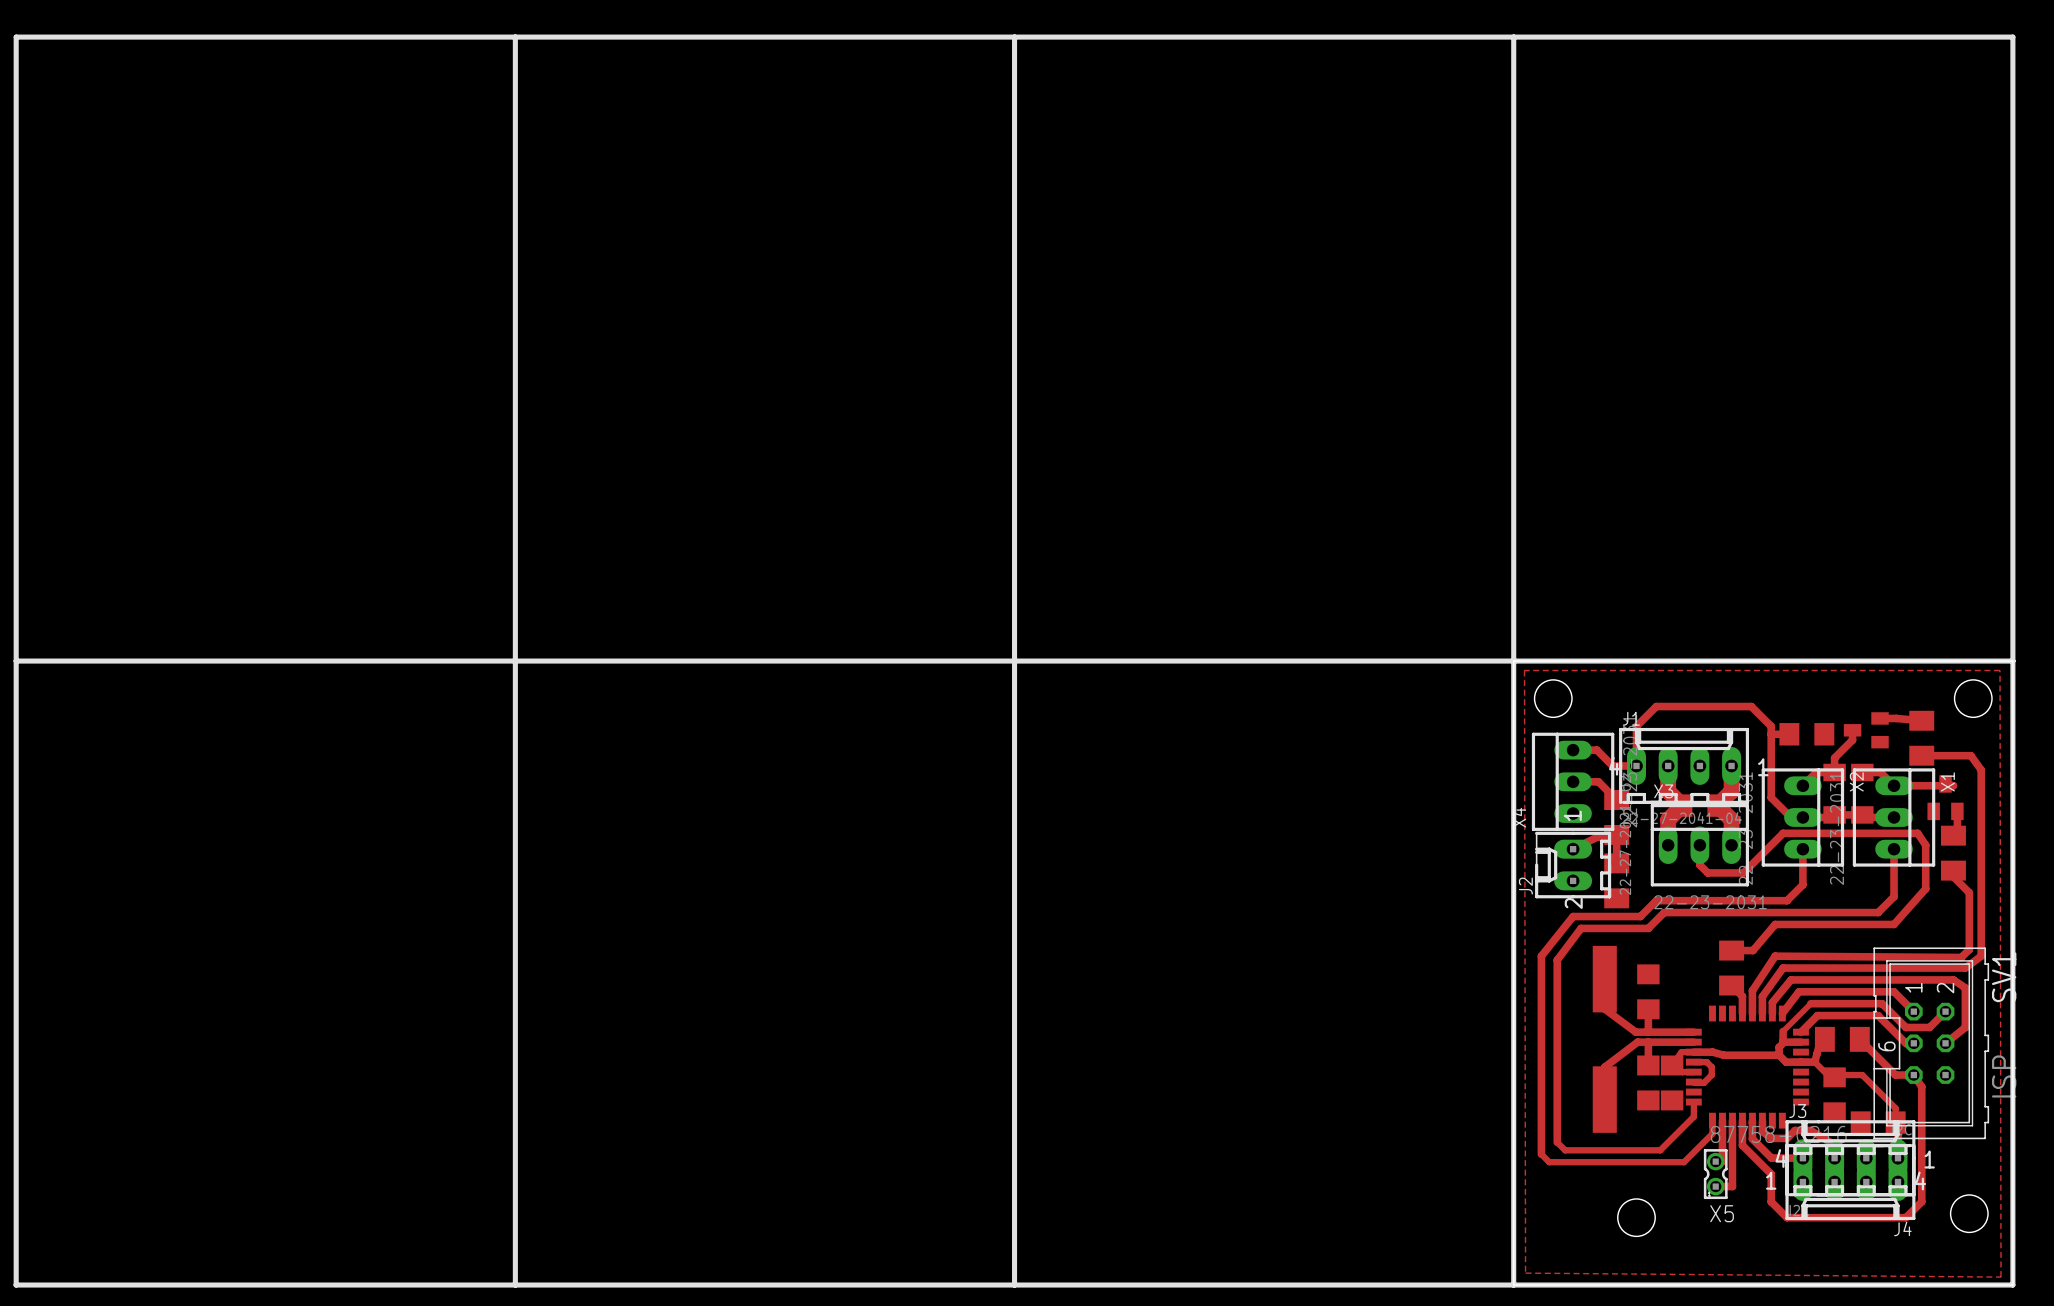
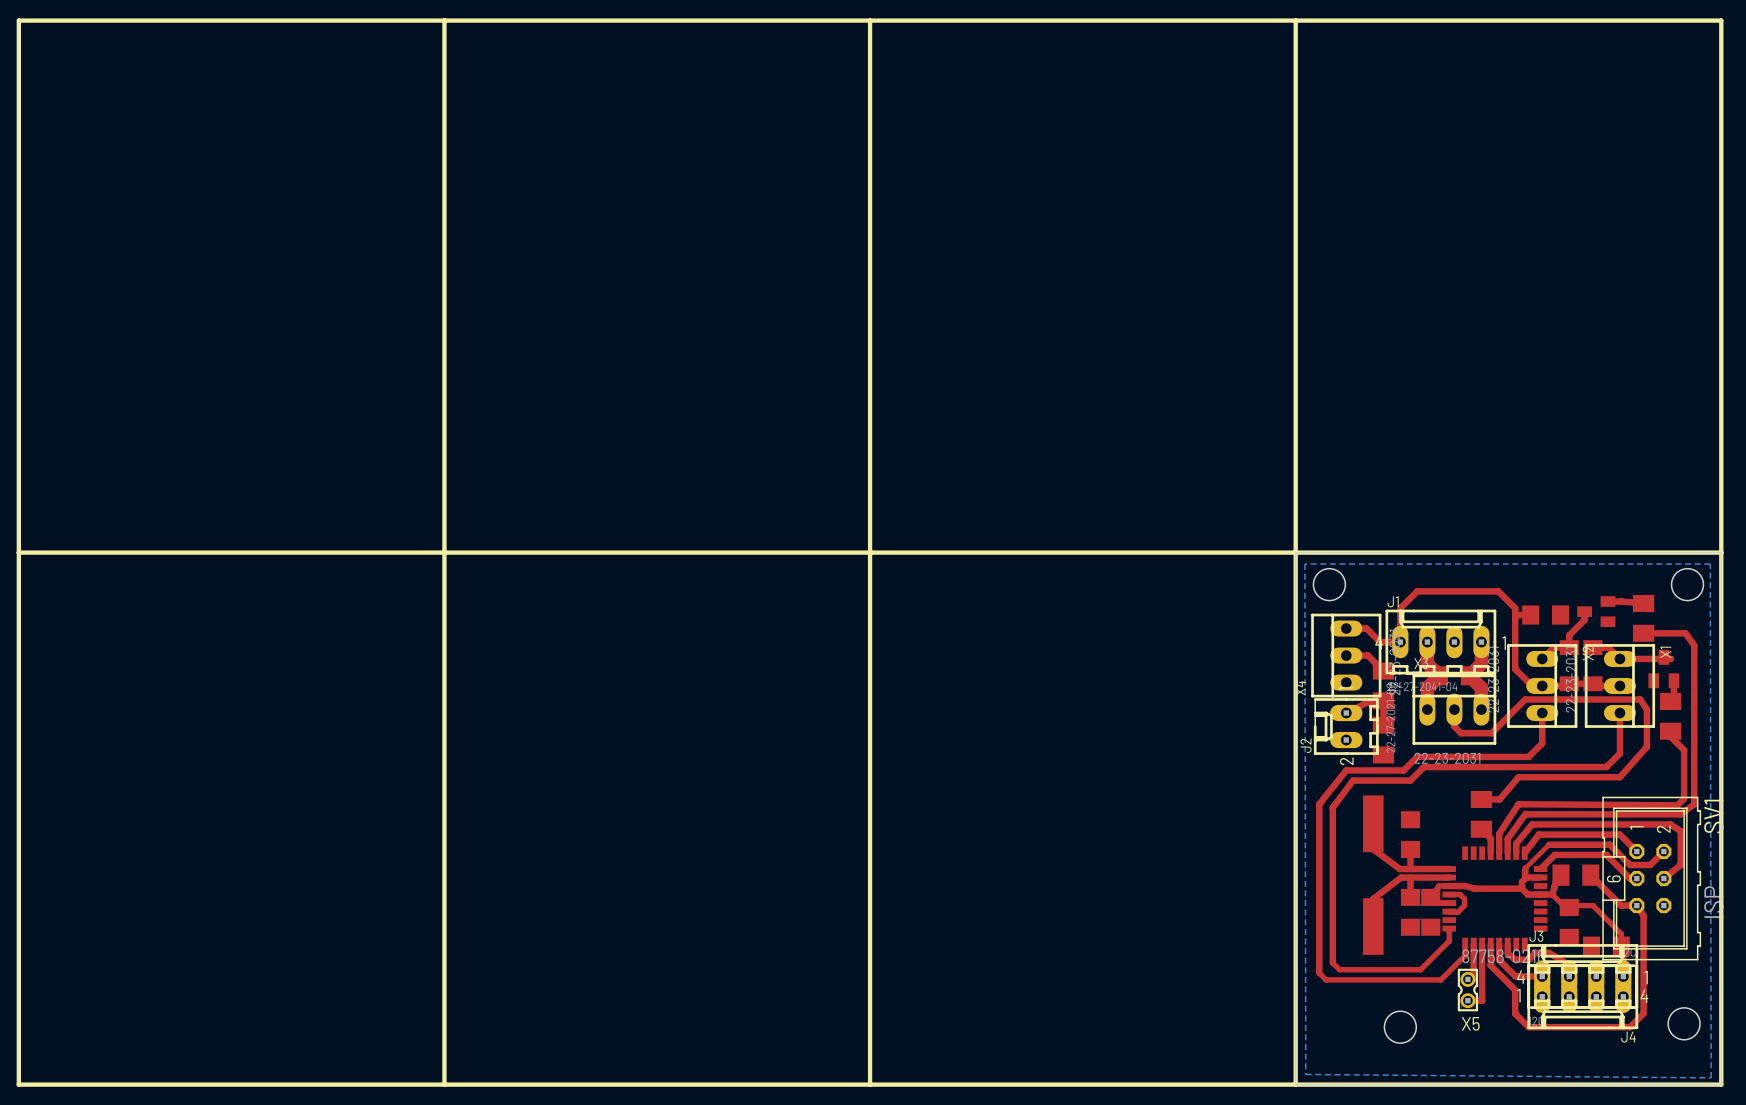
top zone outline: (2000, 670) (2001, 1277) (1525, 1273) (1524, 670) (2000, 670) -> none
bottom zone outline: none -> (1710, 564) (1711, 1077) (1305, 1074) (1304, 564) (1710, 564)

